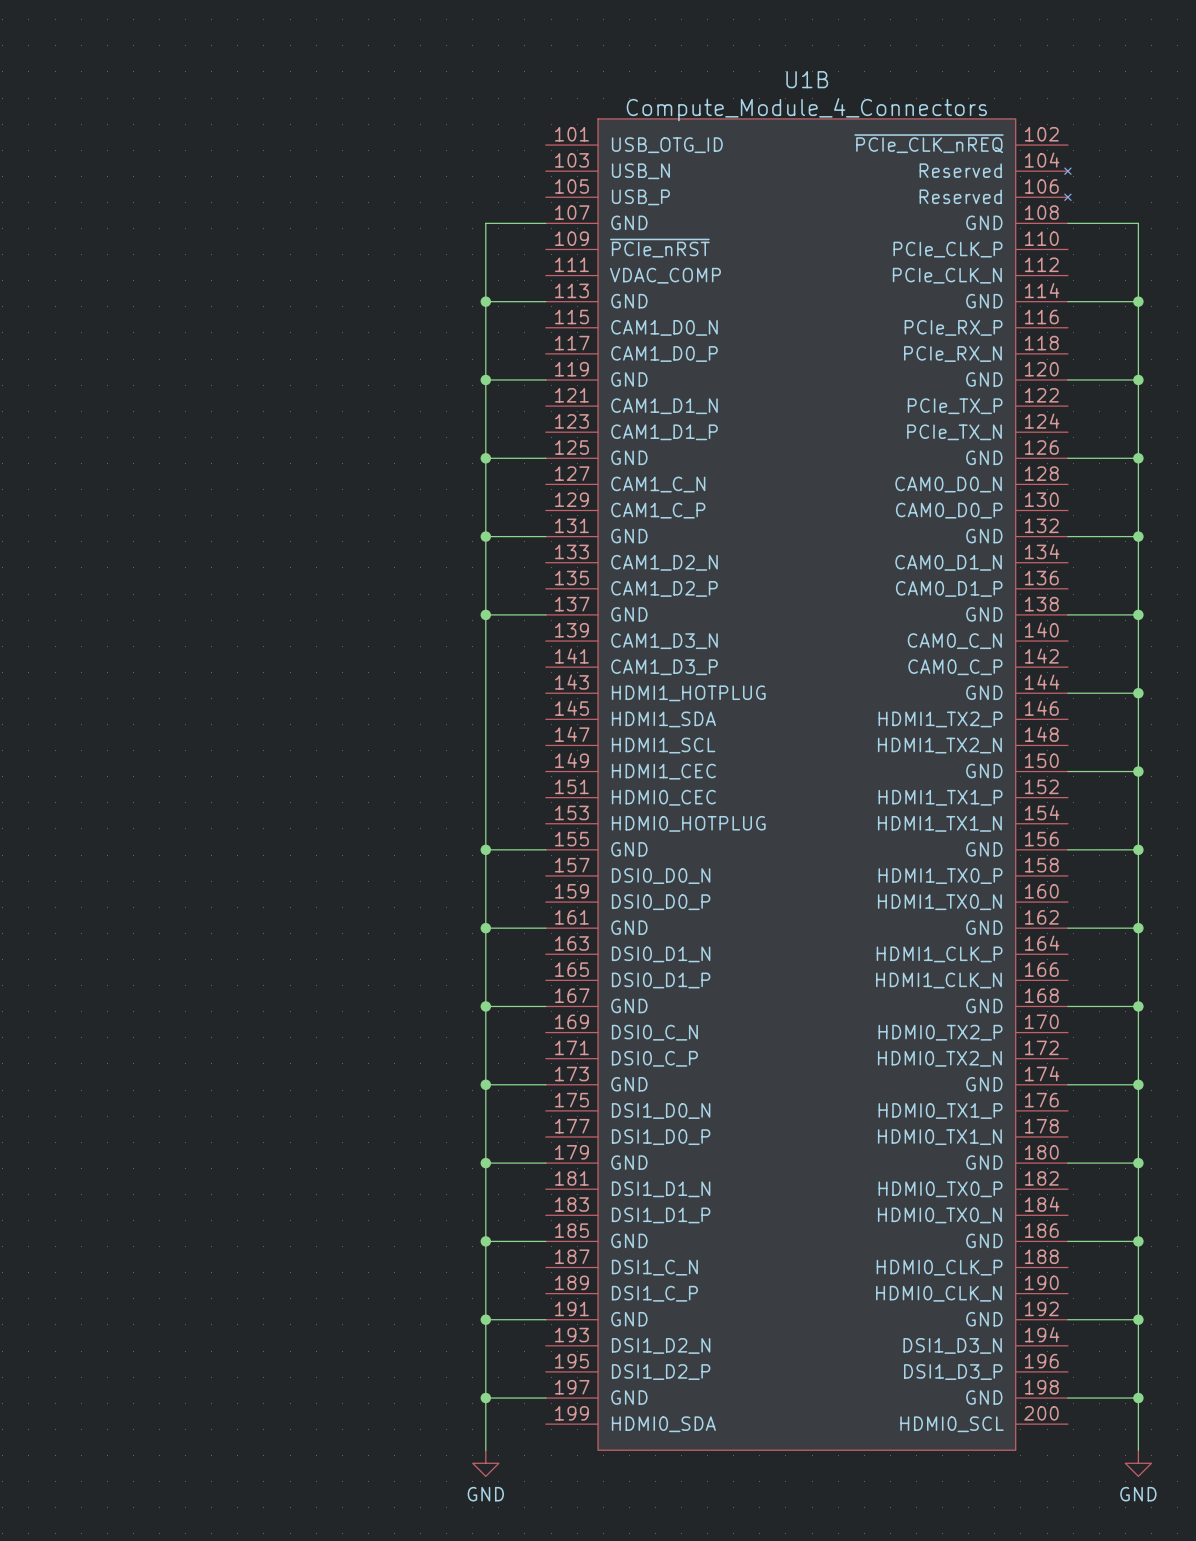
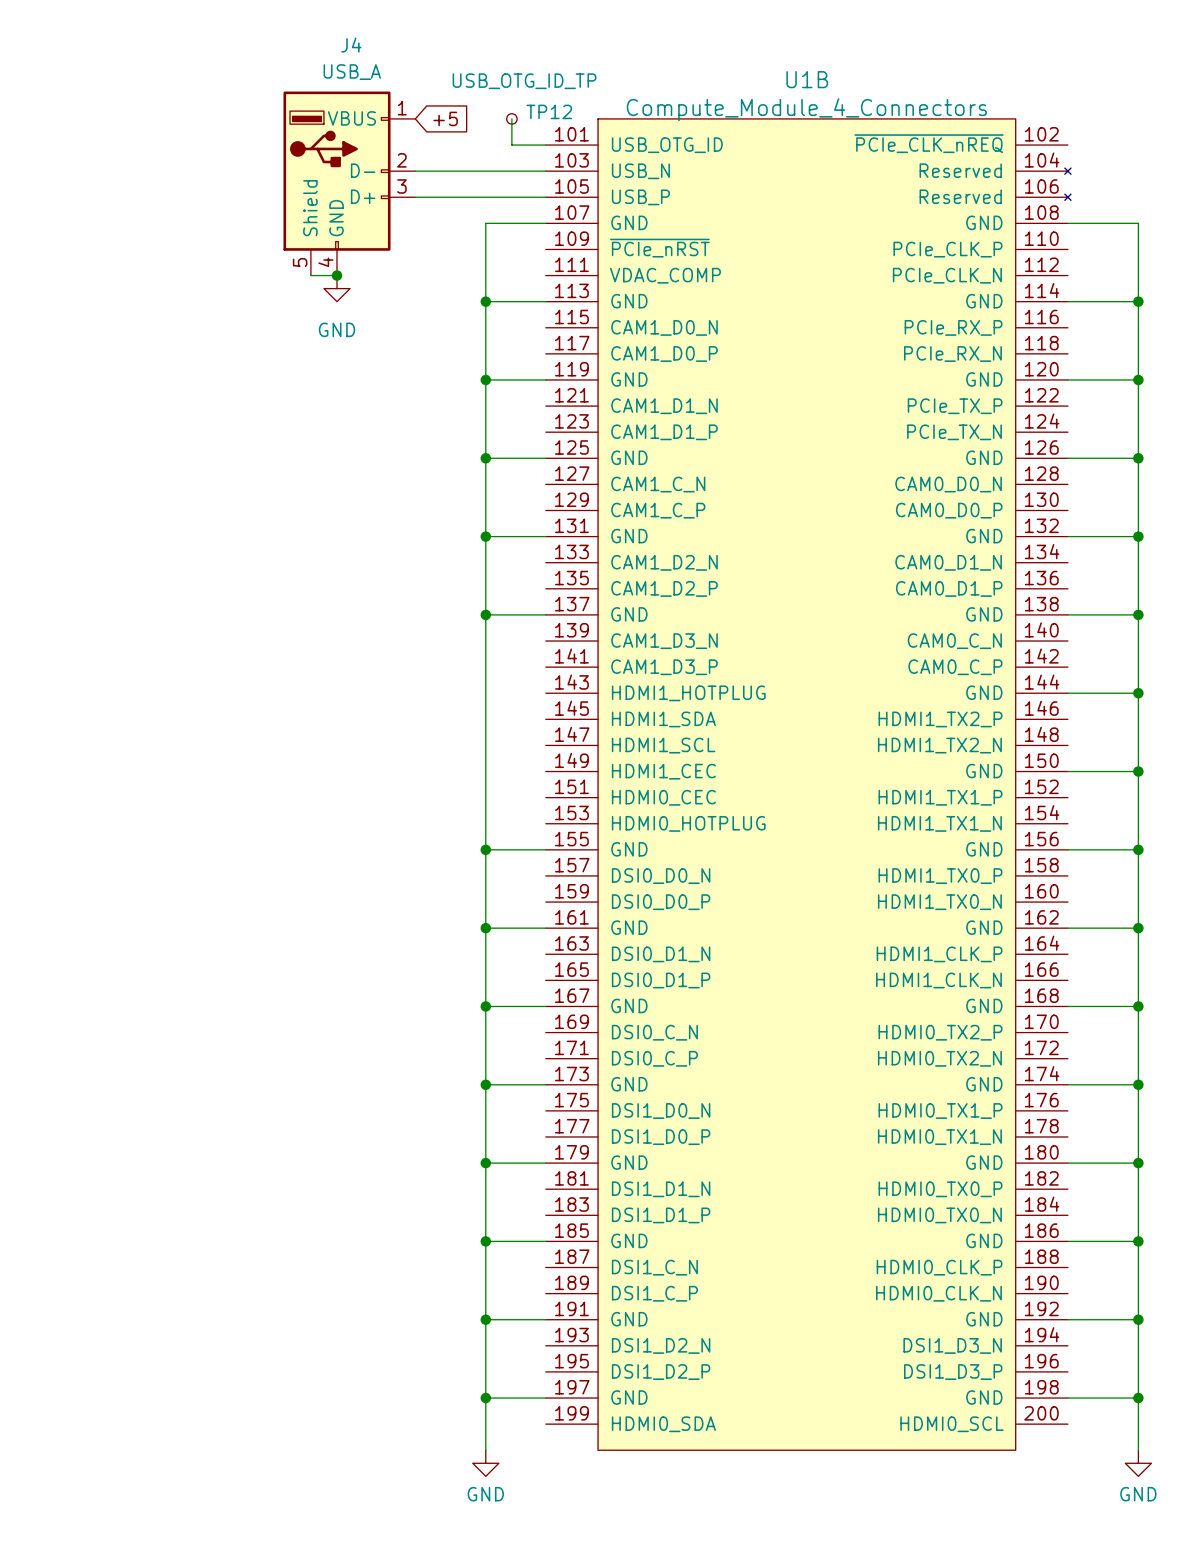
global label: none -> +5 (445, 118)
wire: none -> (511, 118) (511, 145) (545, 145)
TP12: none -> USB_OTG_ID_TP (511, 118)
wire: none -> (415, 171) (545, 171)
J4: none -> USB_A (349, 183)
wire: none -> (415, 197) (545, 197)
wire: none -> (310, 275) (337, 275)
junction: none -> (337, 275)
power symbol: none -> GND (337, 288)

